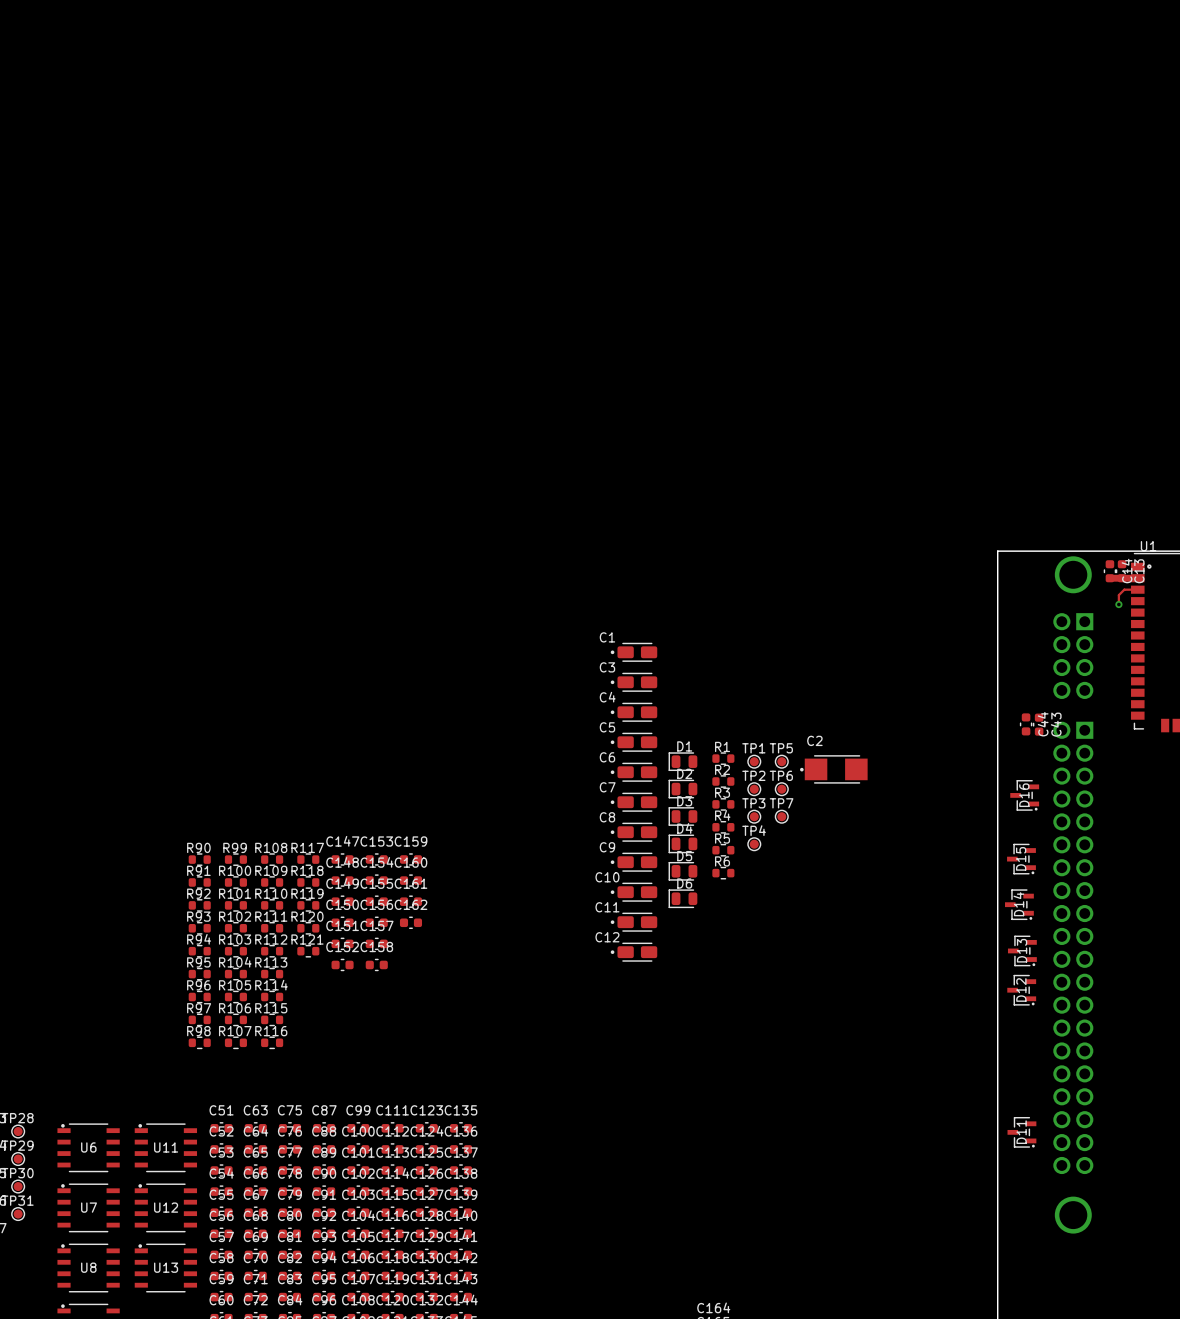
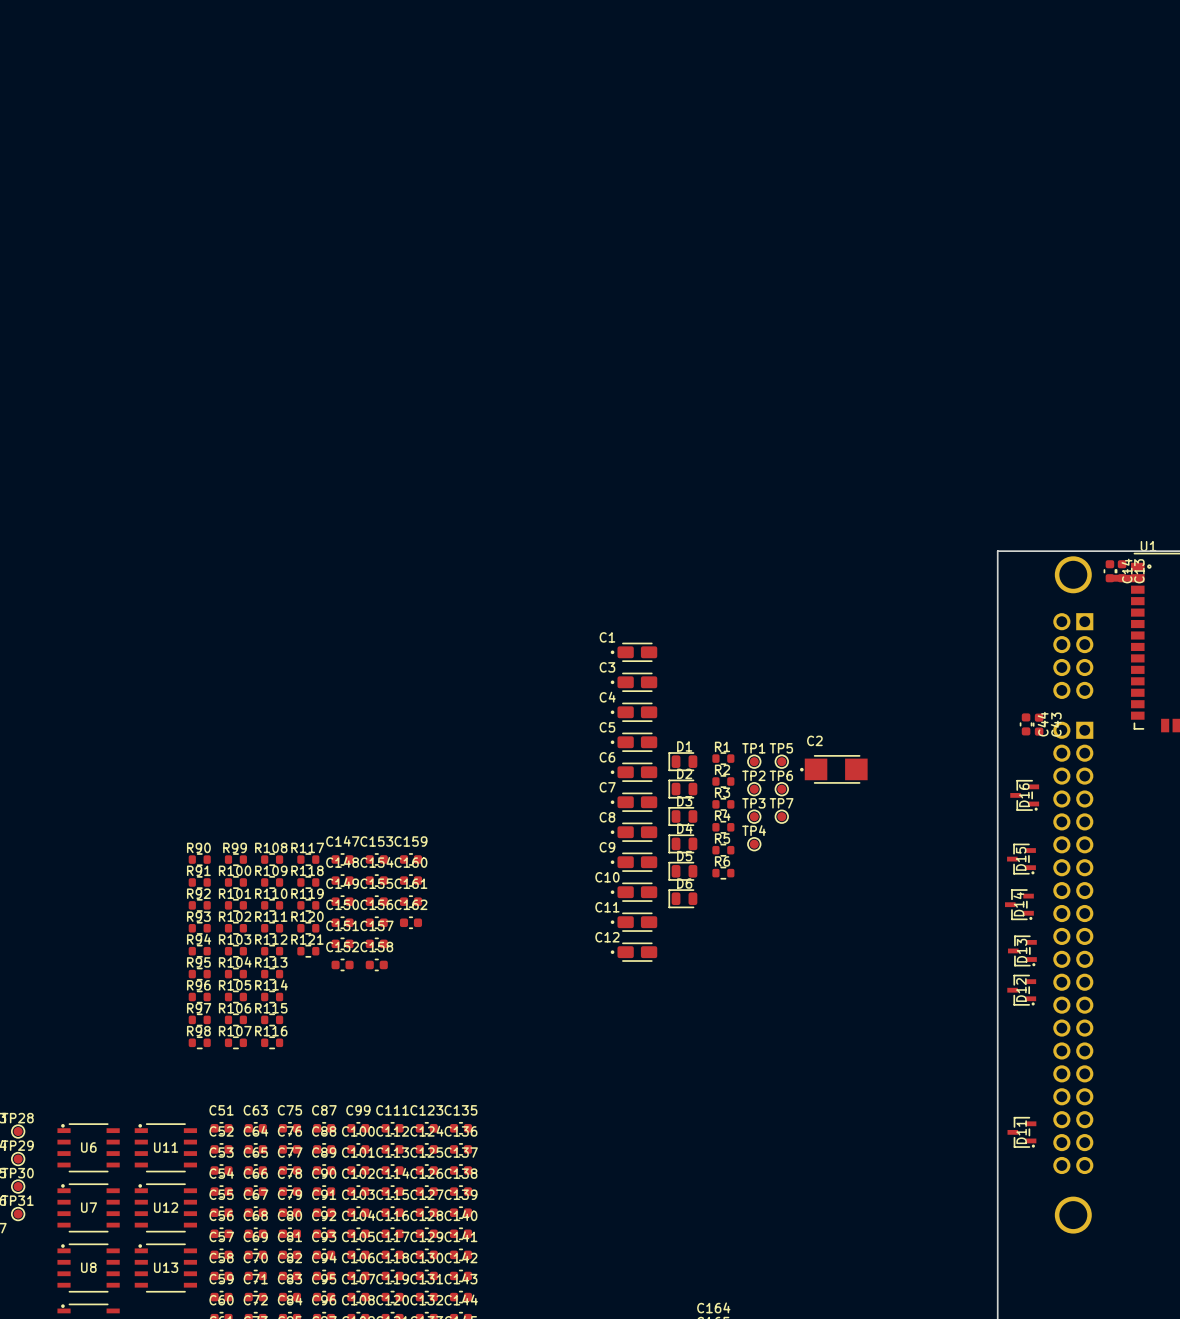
track: (1137, 589) (1124, 589) (1118, 595) (1118, 604) -> none
via: (1118, 604) -> none

